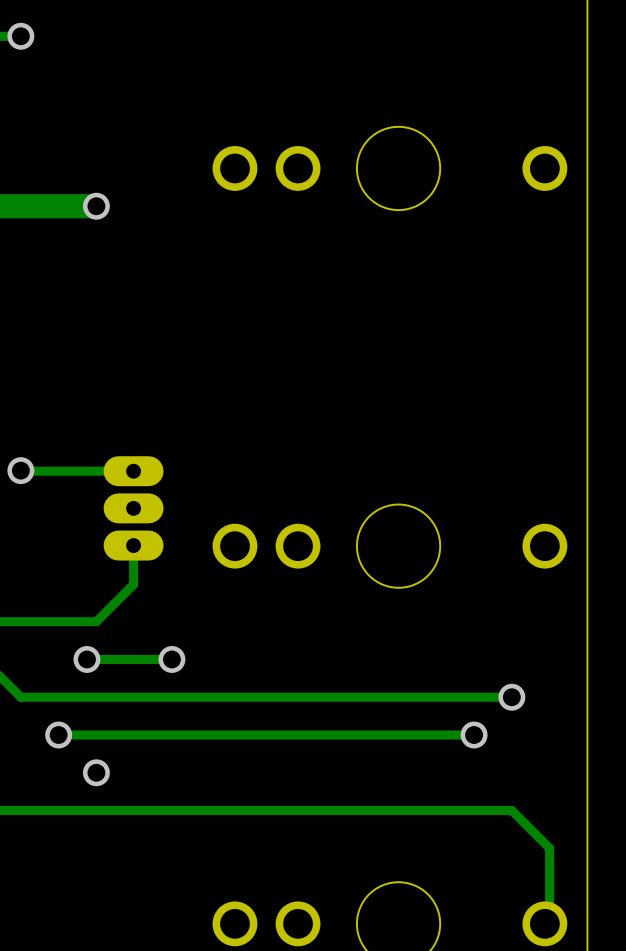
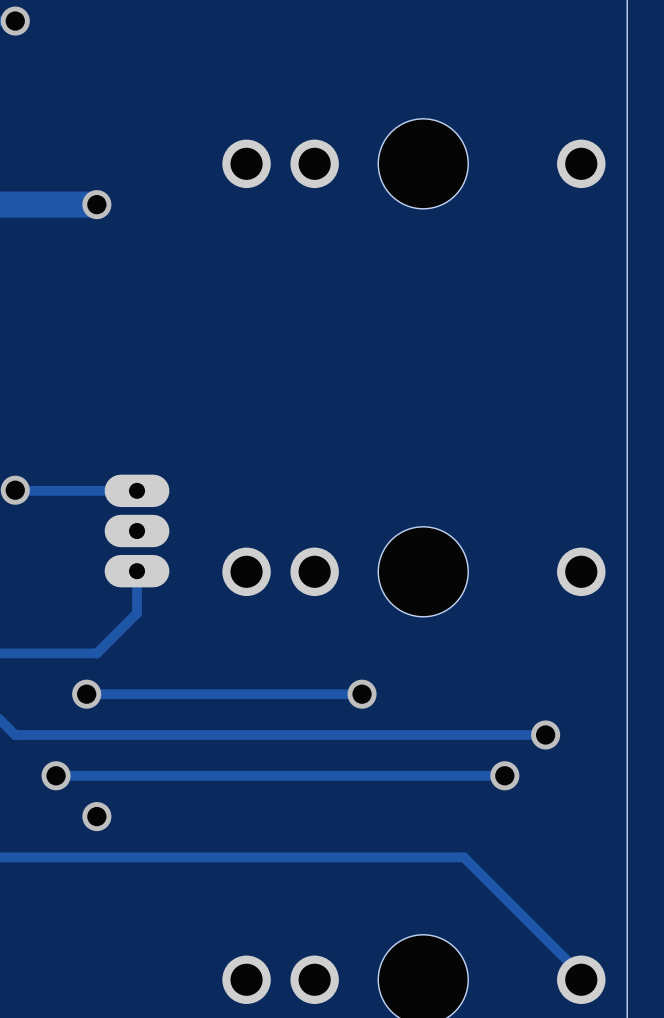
via position: (171, 659) -> (362, 694)
track: none -> (362, 694) (178, 694)
track: (436, 810) (511, 810) (549, 848) (549, 919) -> (464, 857) (586, 979) (586, 974)

